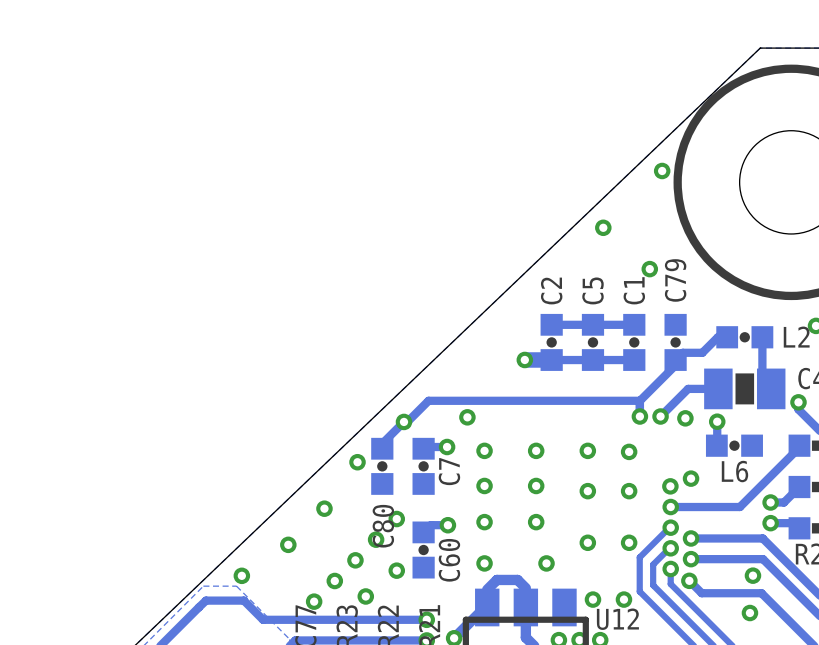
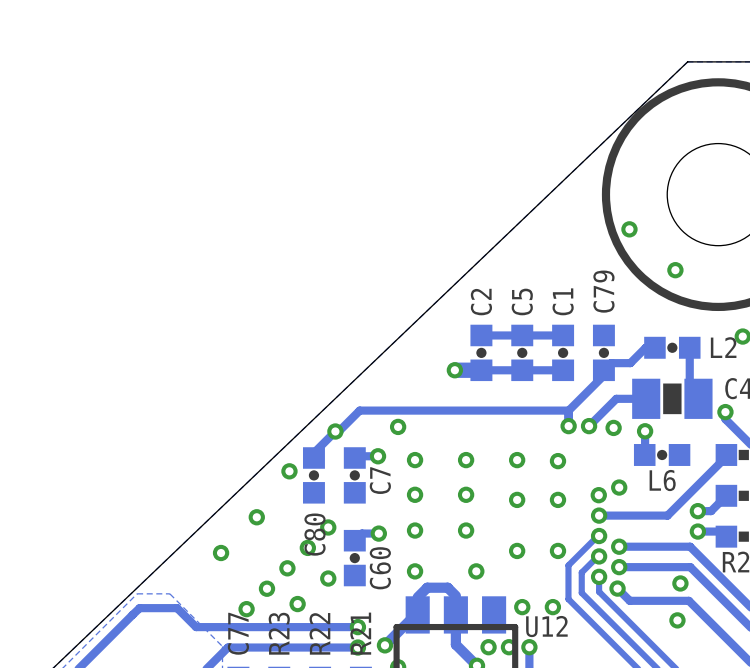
via: (662, 170) -> none
via: none -> (629, 229)
via: (603, 227) -> none
via: none -> (675, 270)
via: (649, 269) -> none
via: (241, 575) -> none

